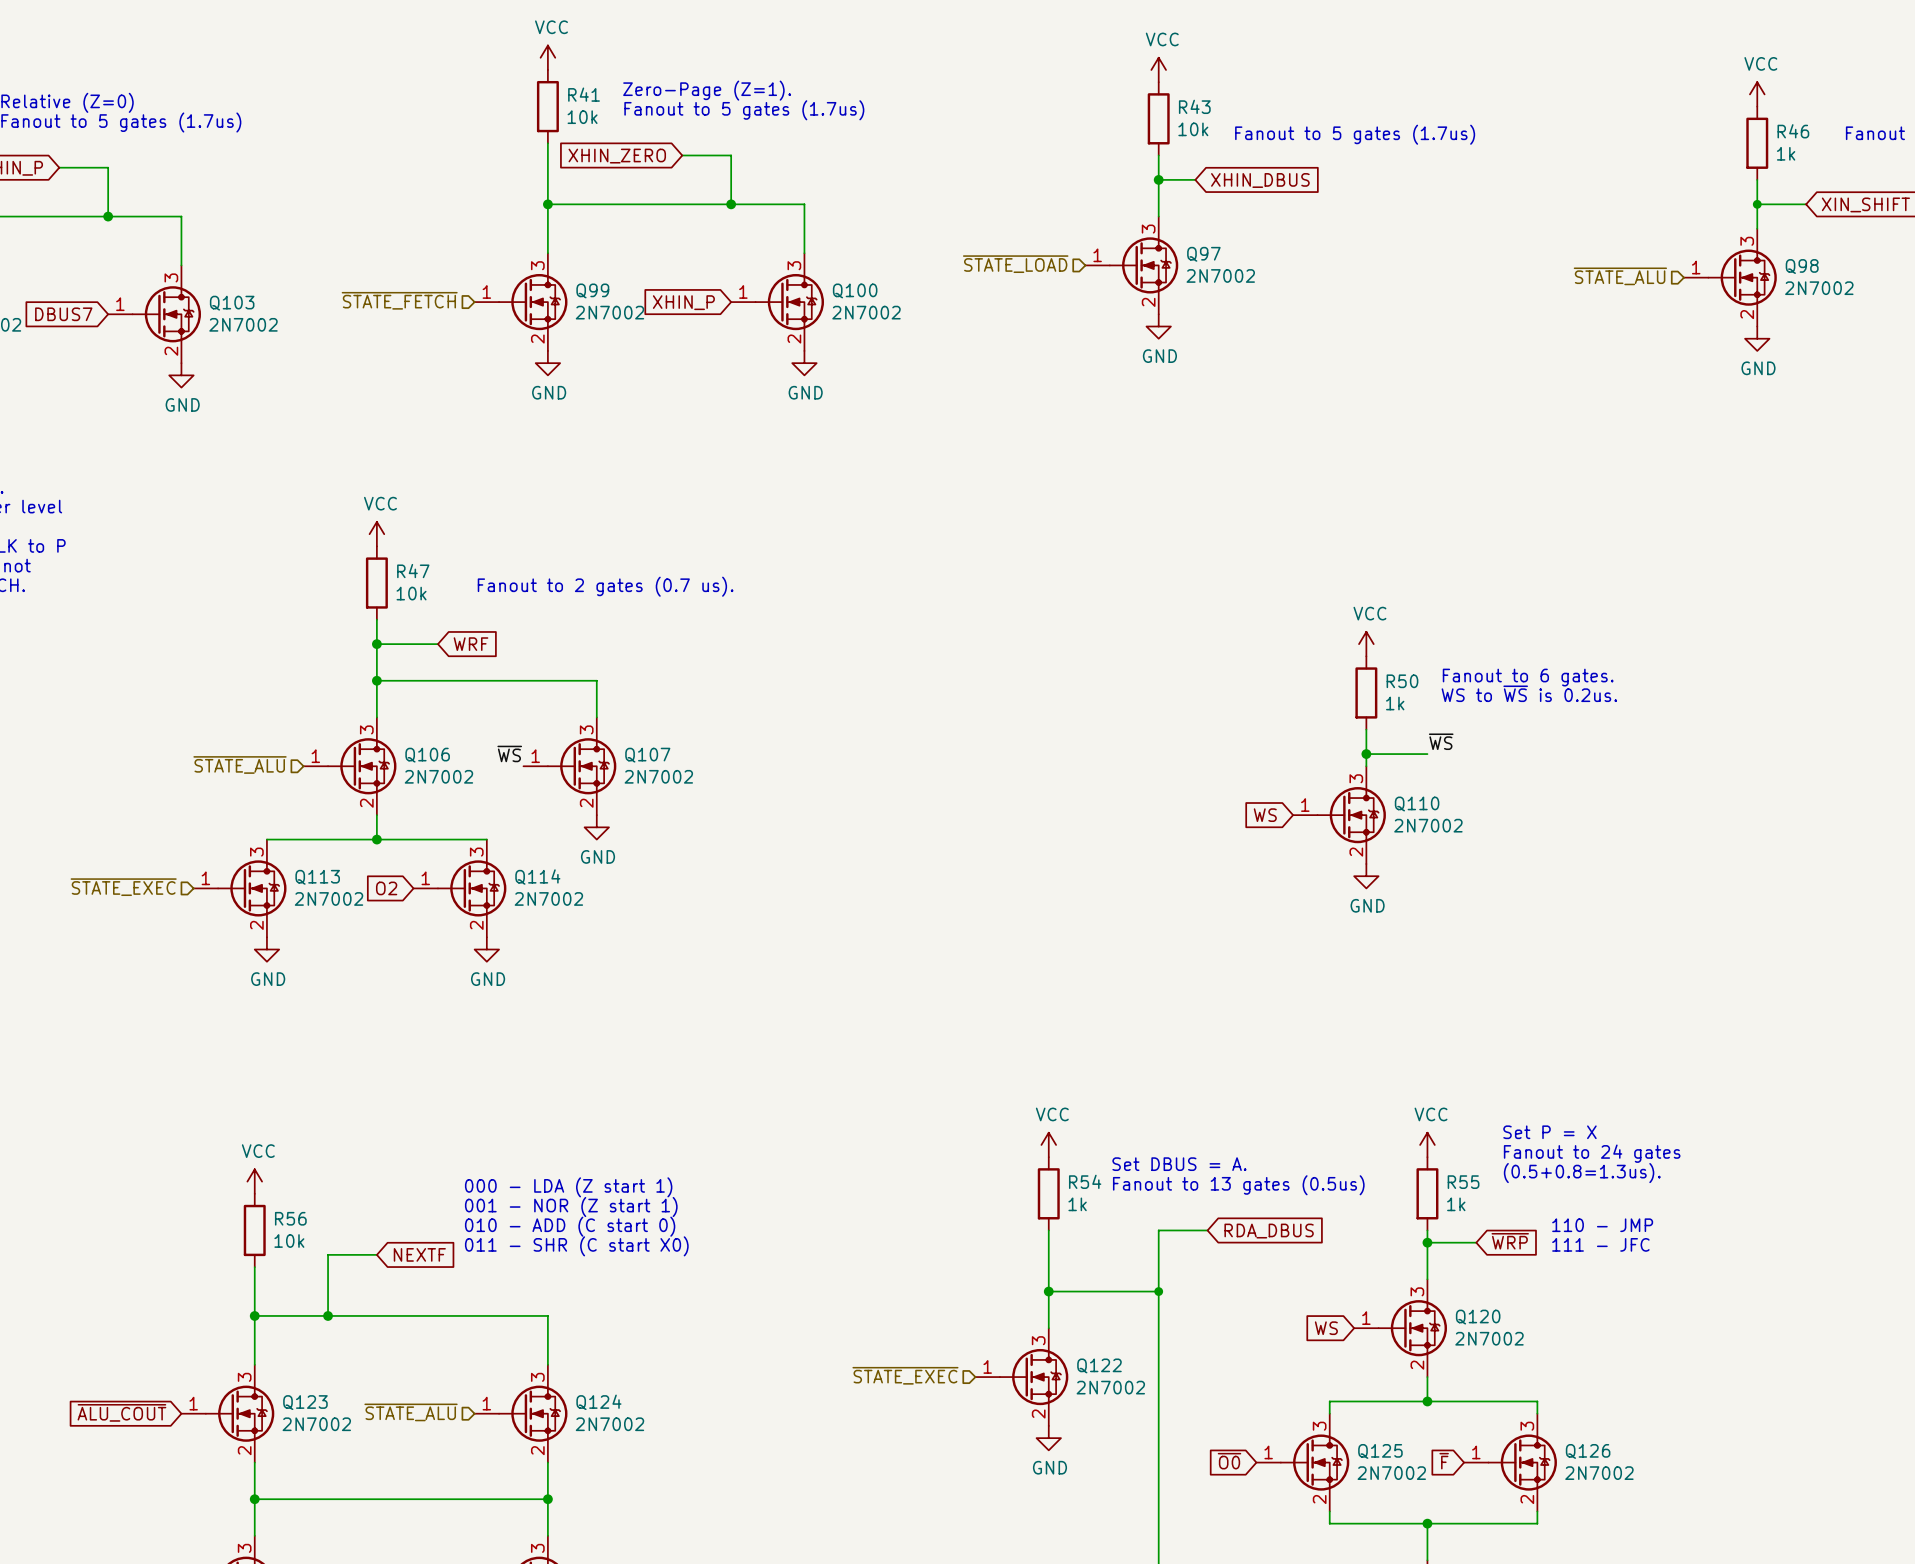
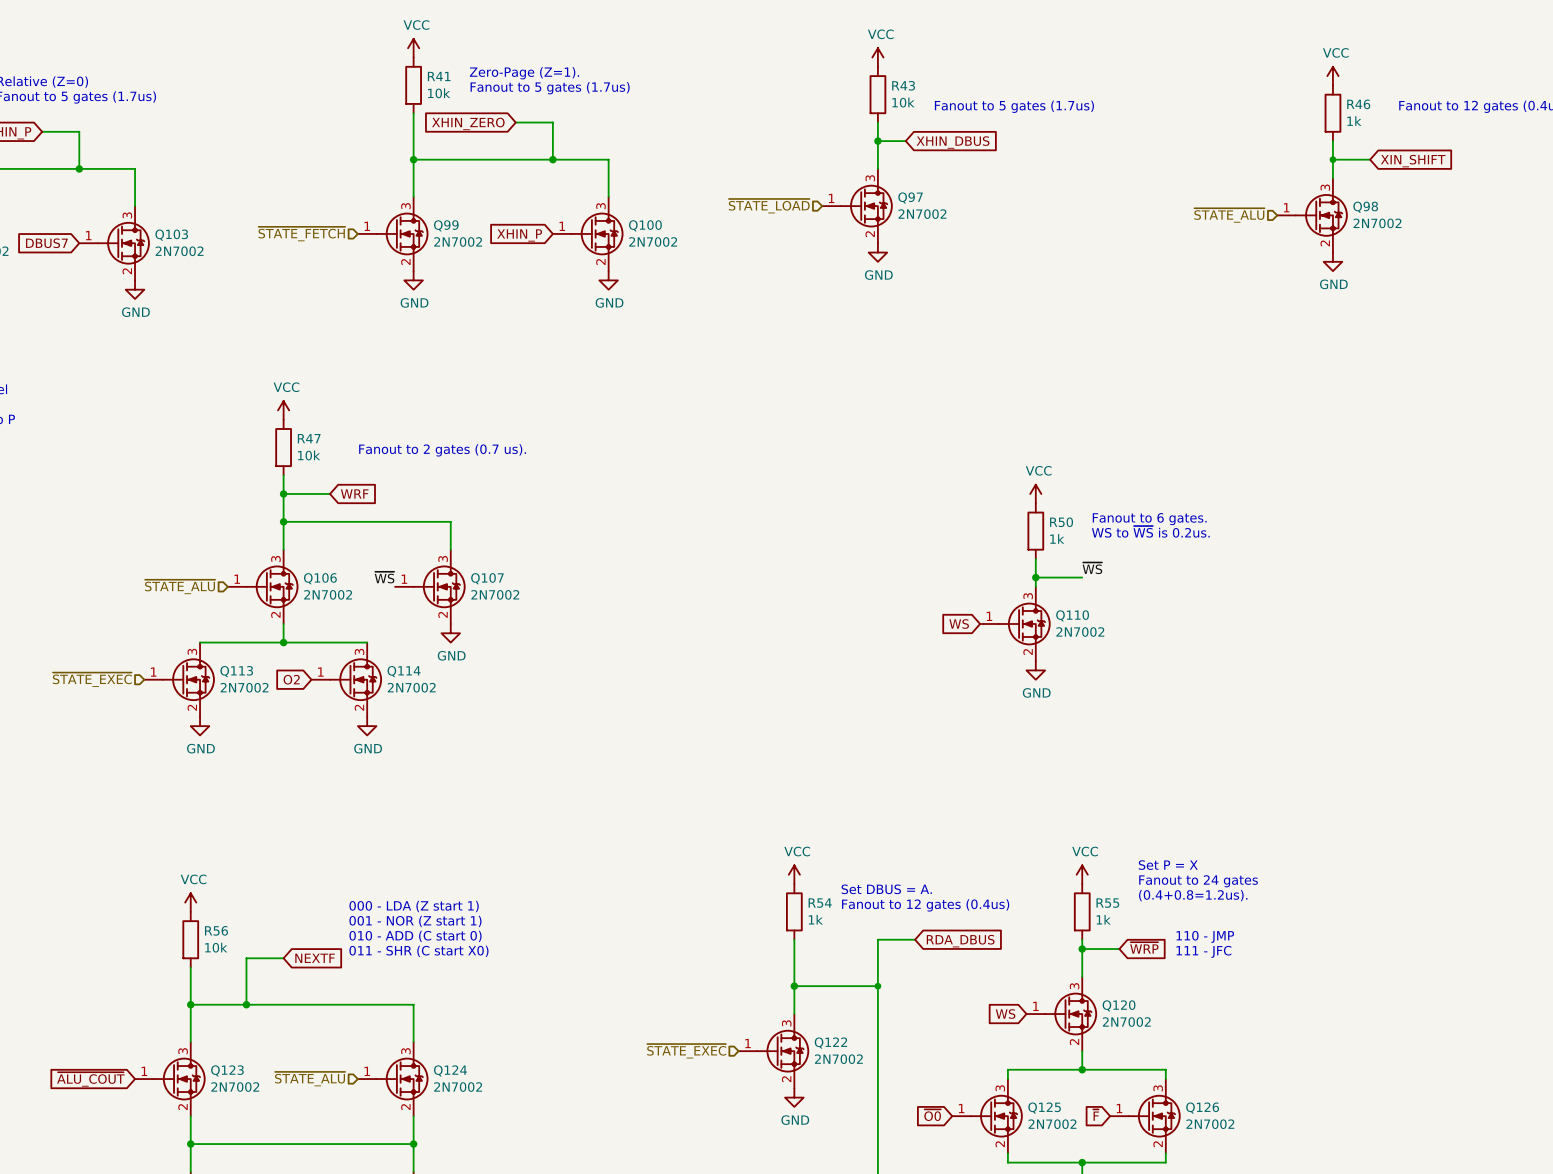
text: (0.5+0.8=1.3us). (1582, 1173) -> (0.4+0.8=1.2us). (1193, 895)
text: Fanout to 13 gates (0.5us) (1238, 1185) -> Fanout to 12 gates (0.4us) (925, 905)

